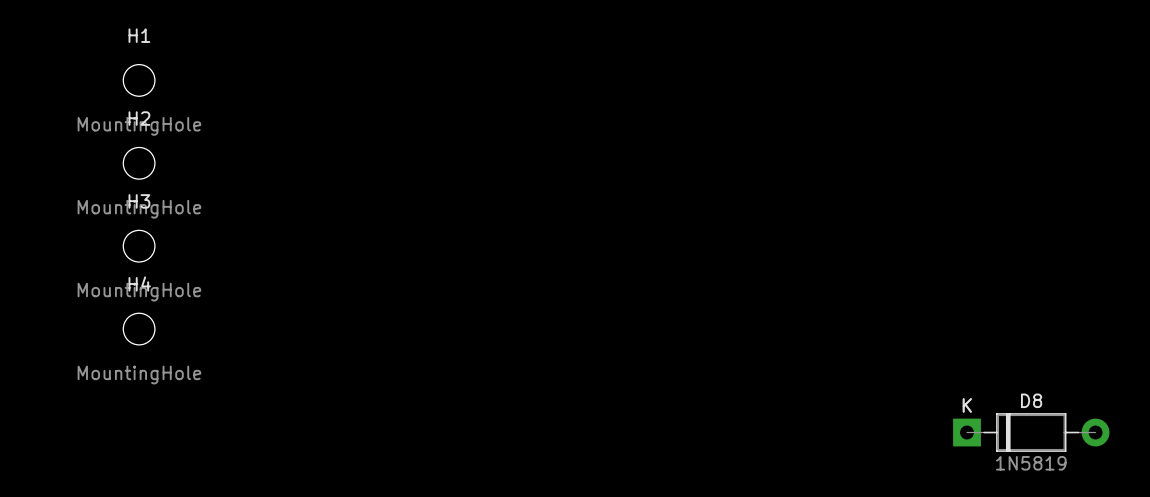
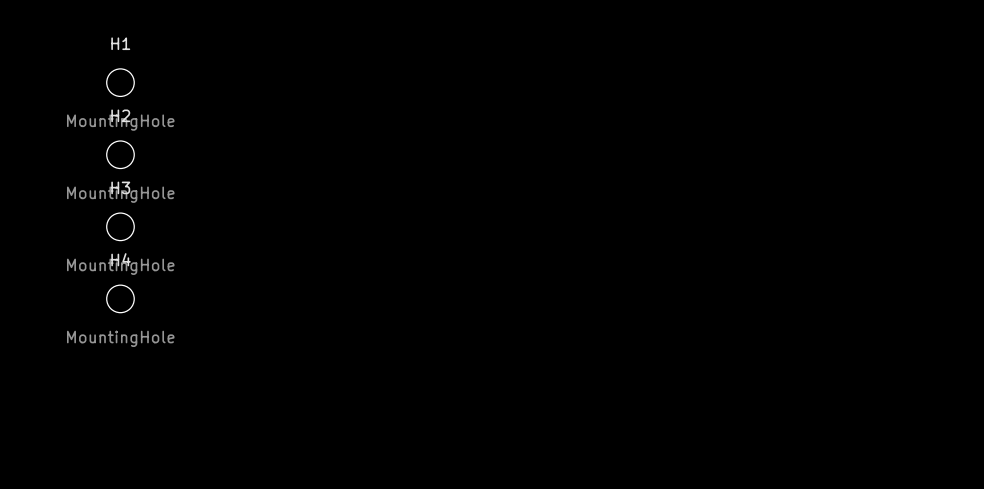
D8: 1N5819 (1031, 432) -> none

